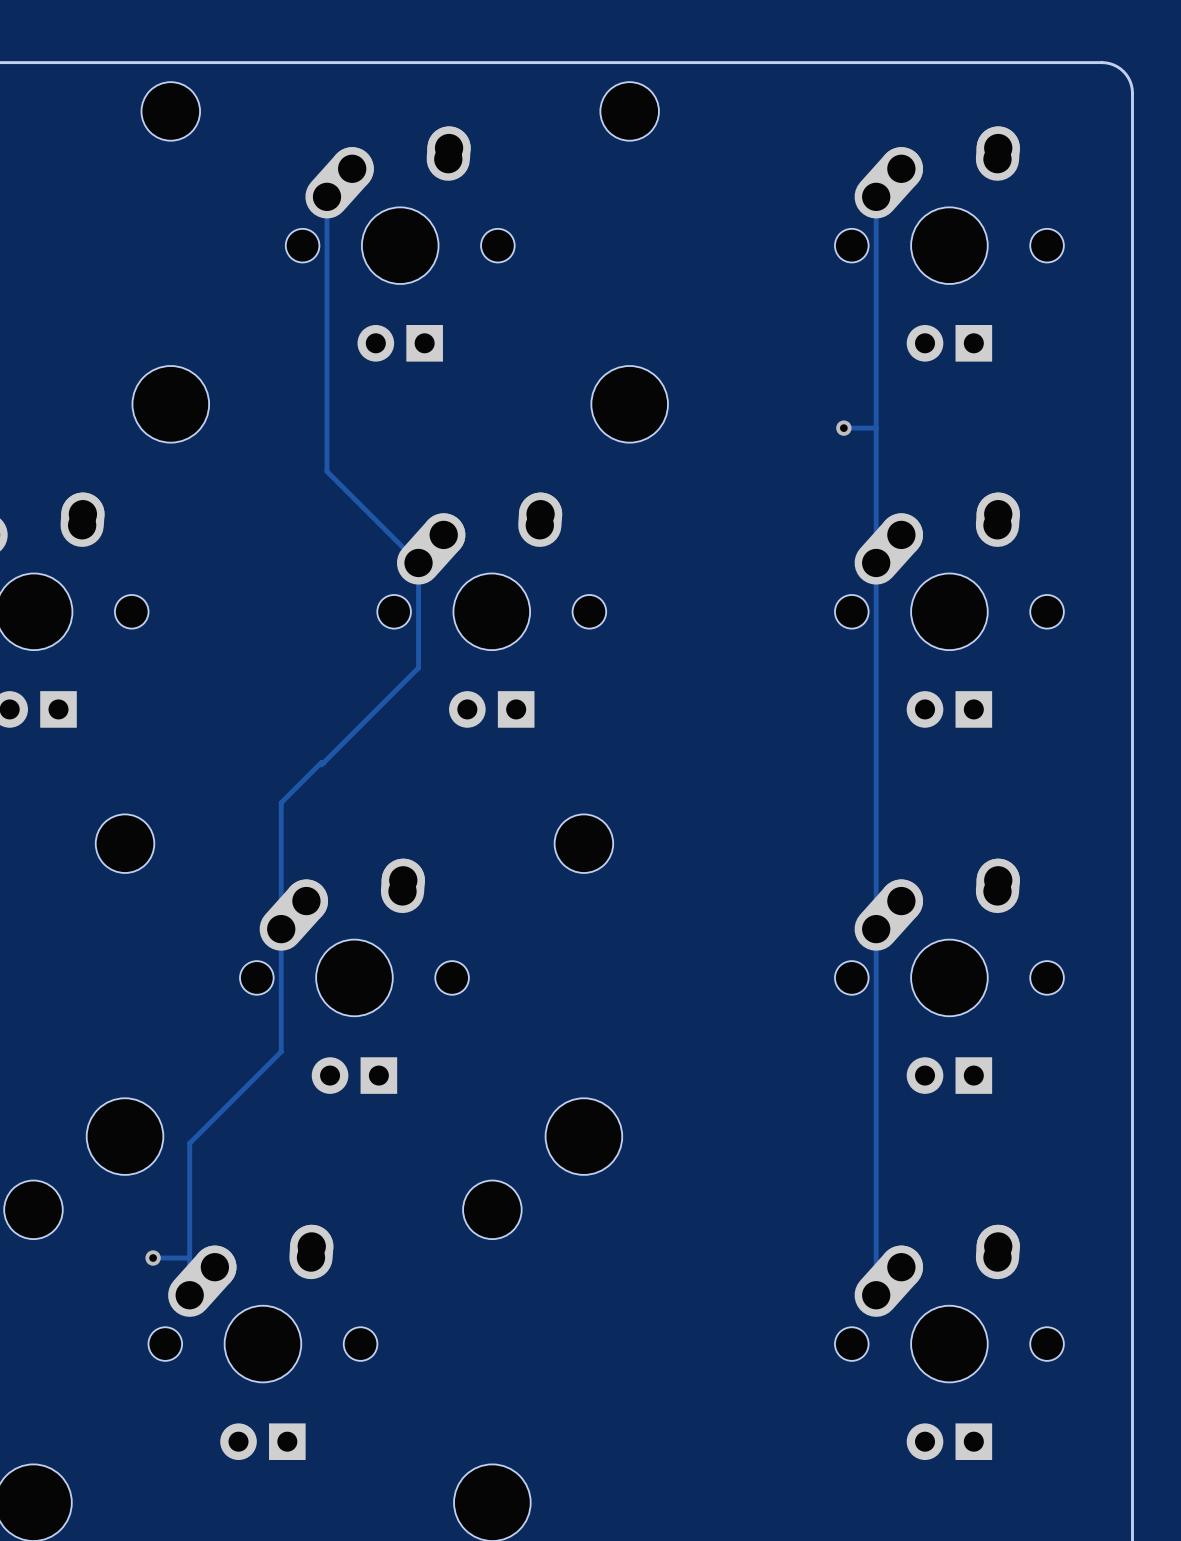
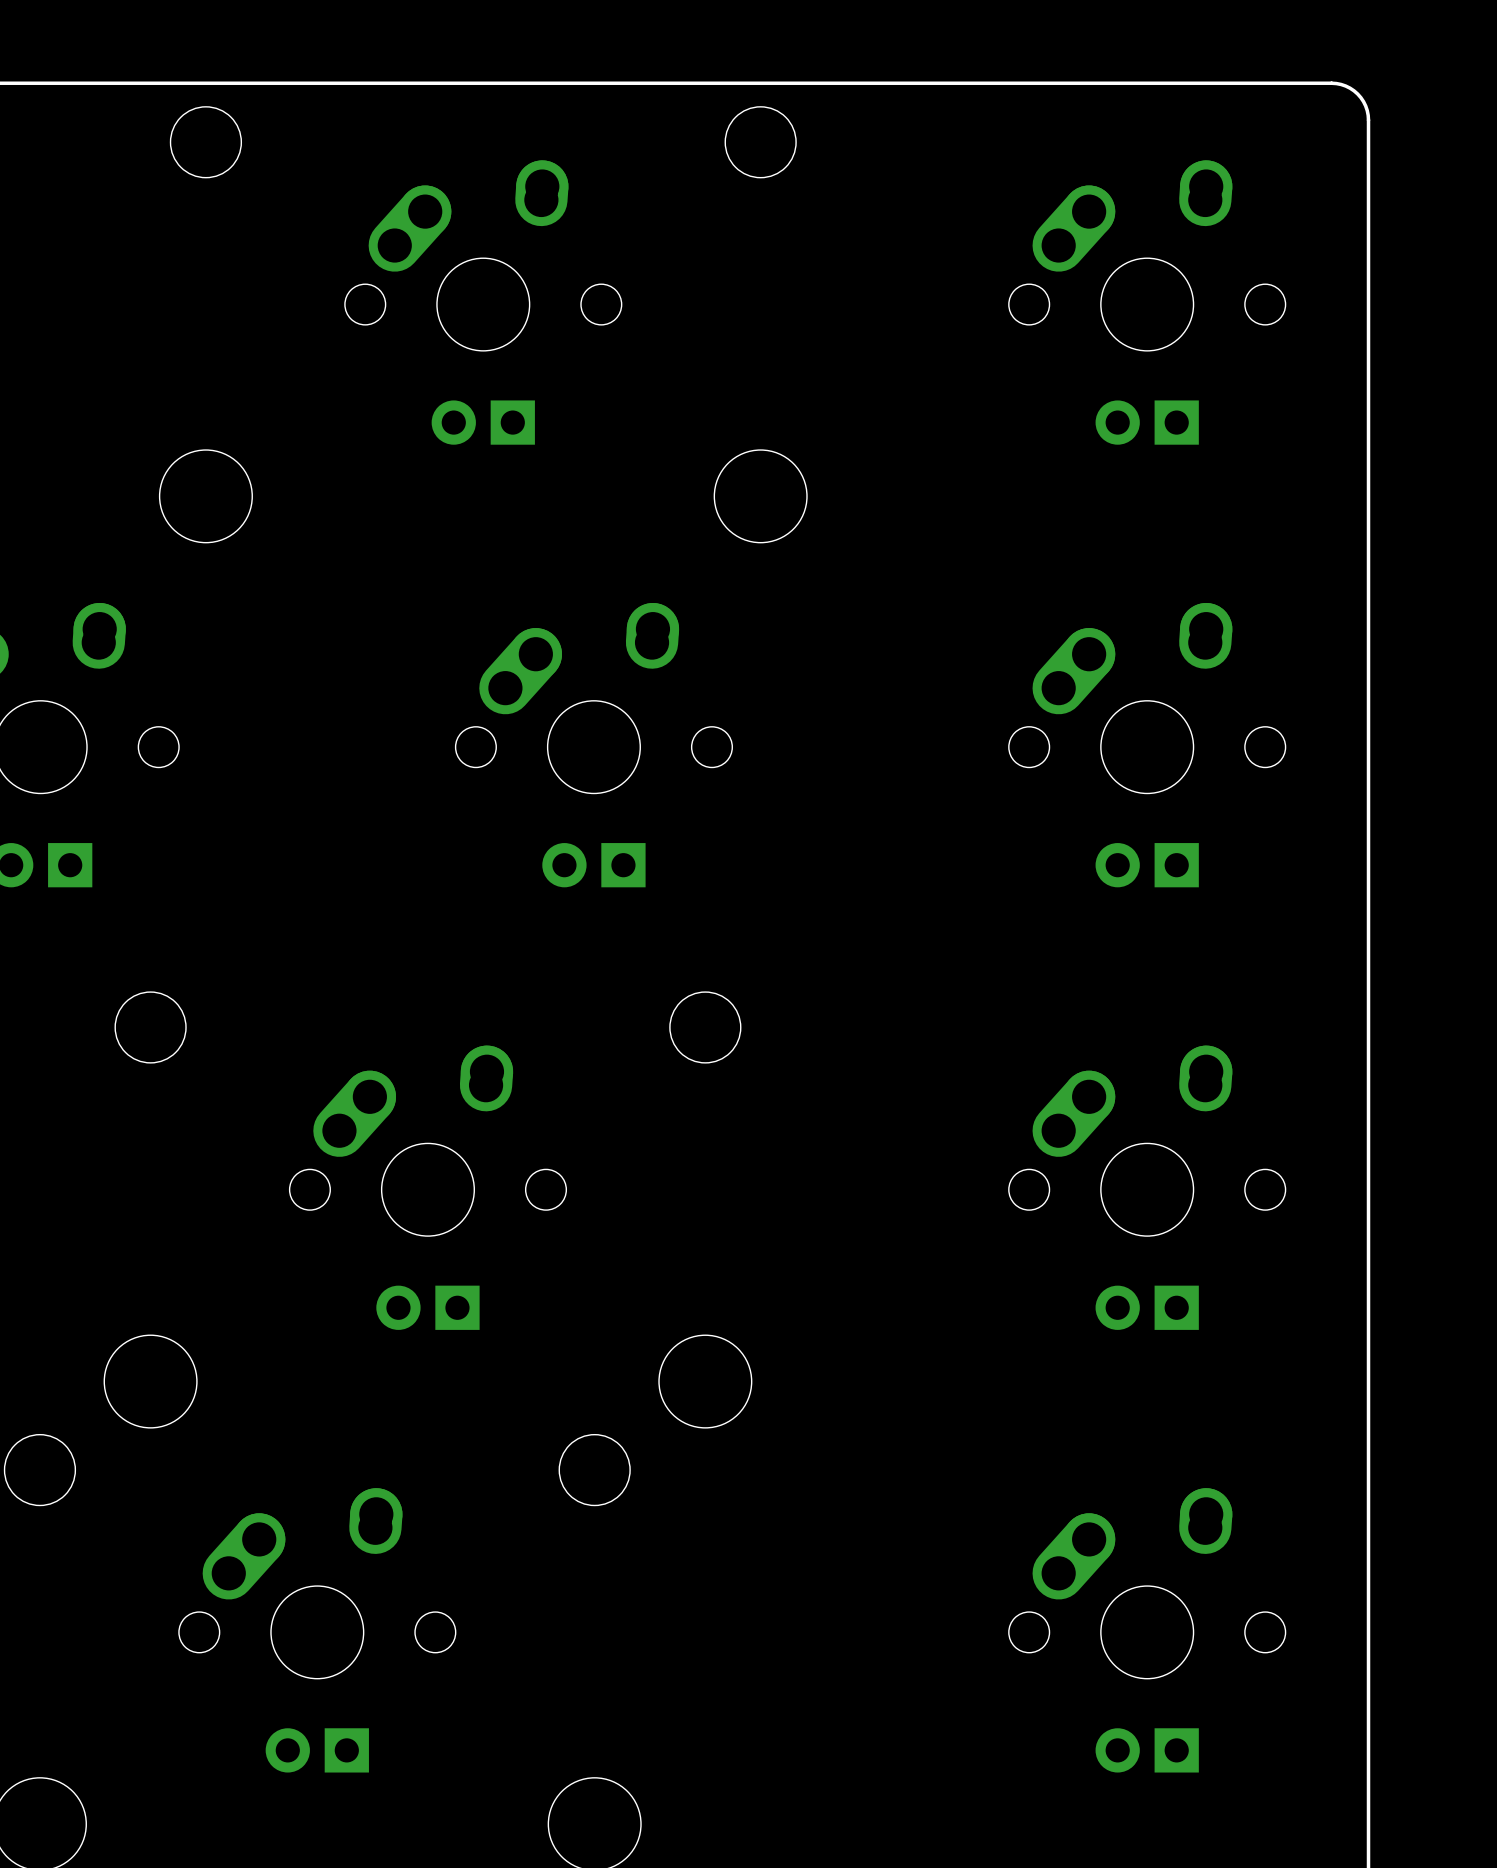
track: (327, 196) (327, 471) (418, 562) (418, 667) (321, 764) -> none
track: (876, 196) (876, 1295) -> none
track: (843, 428) (876, 428) -> none
via: (843, 428) -> none
track: (323, 762) (321, 762) (281, 802) (281, 1051) (189, 1143) (189, 1295) -> none
track: (153, 1258) (189, 1258) -> none
via: (153, 1258) -> none

